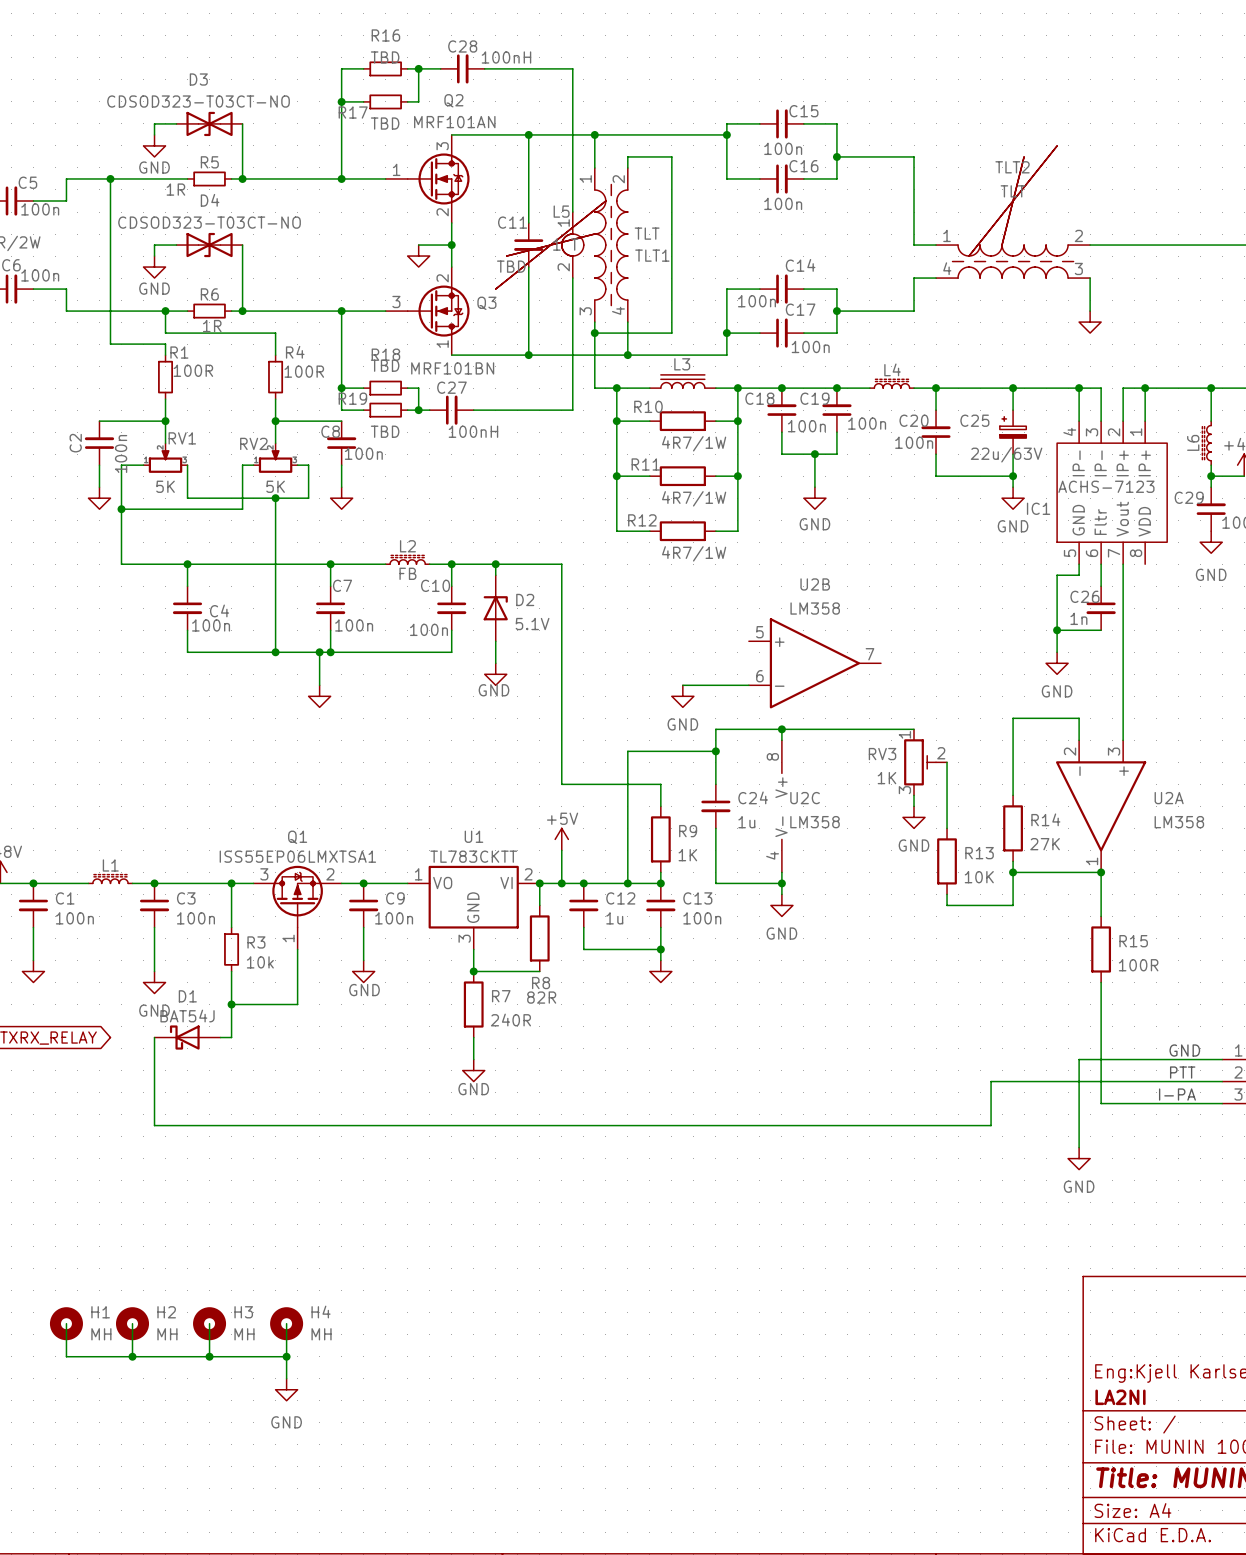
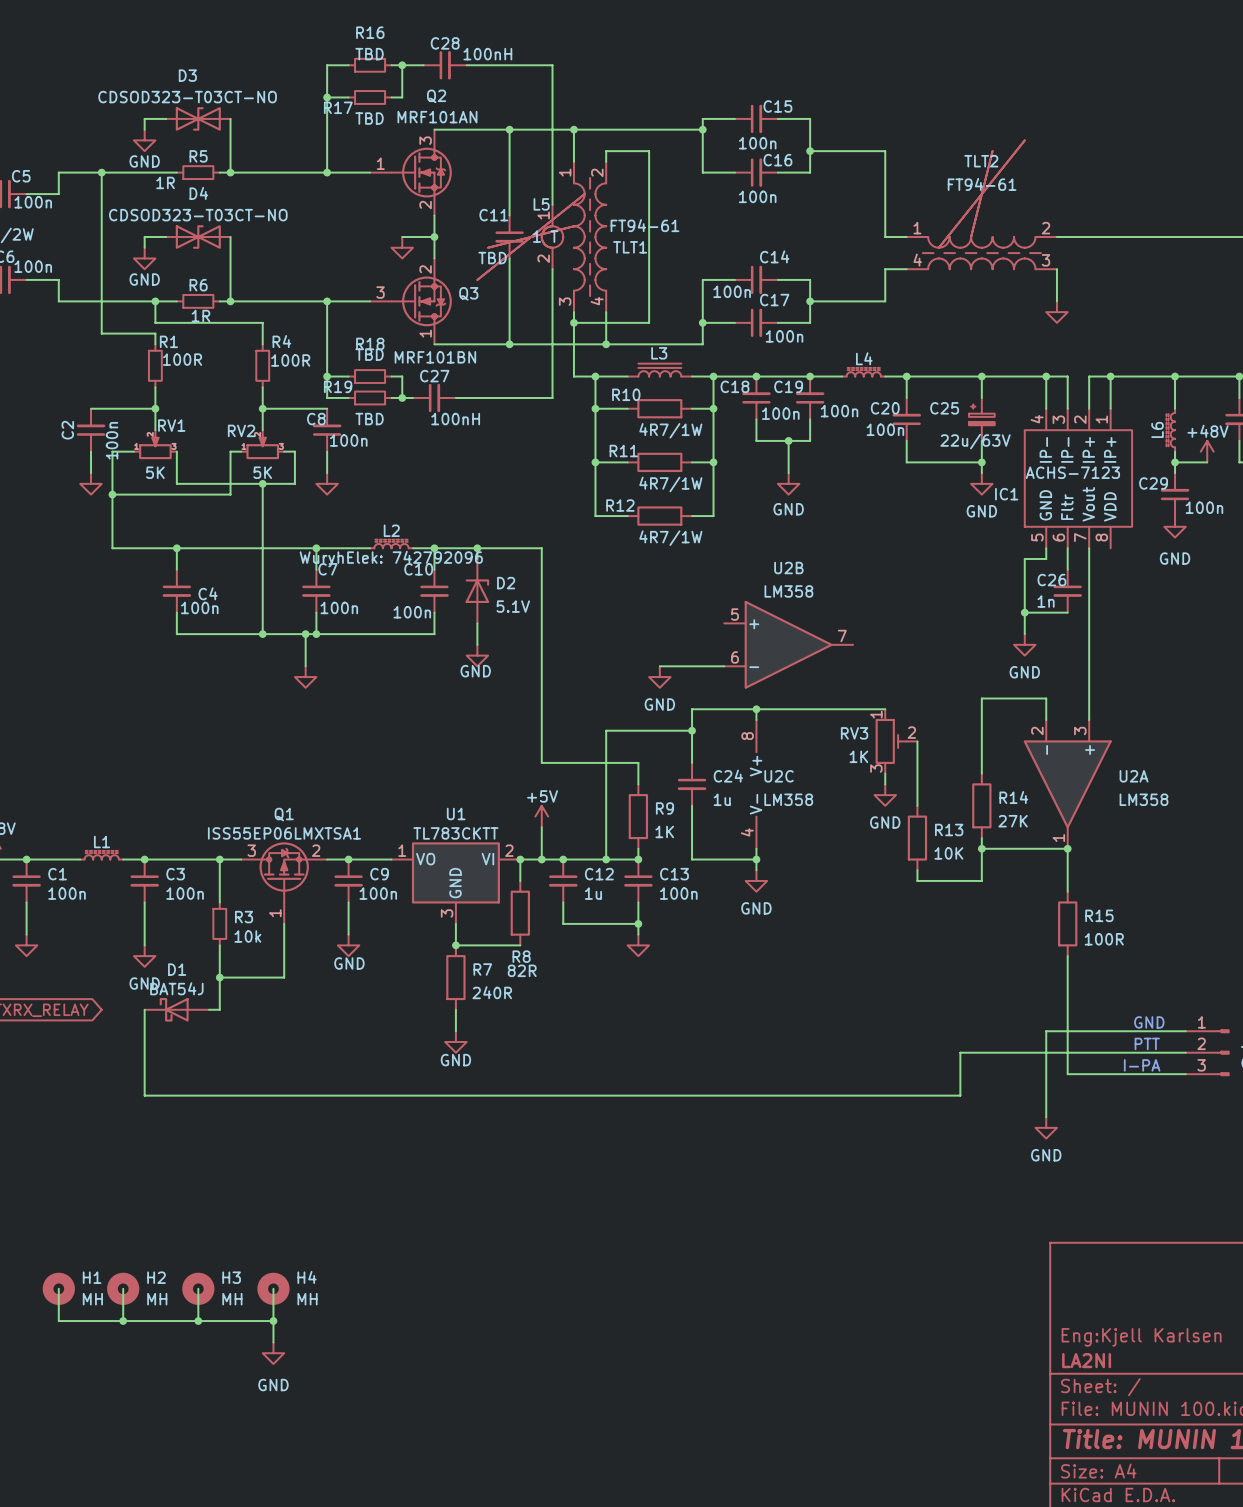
TLT2 value: TLT (1013, 191) -> FT94-61 (982, 184)
TLT1 value: TLT (647, 233) -> FT94-61 (644, 225)
L2 value: FB (407, 573) -> WuryhElek: 742792096 (391, 559)

